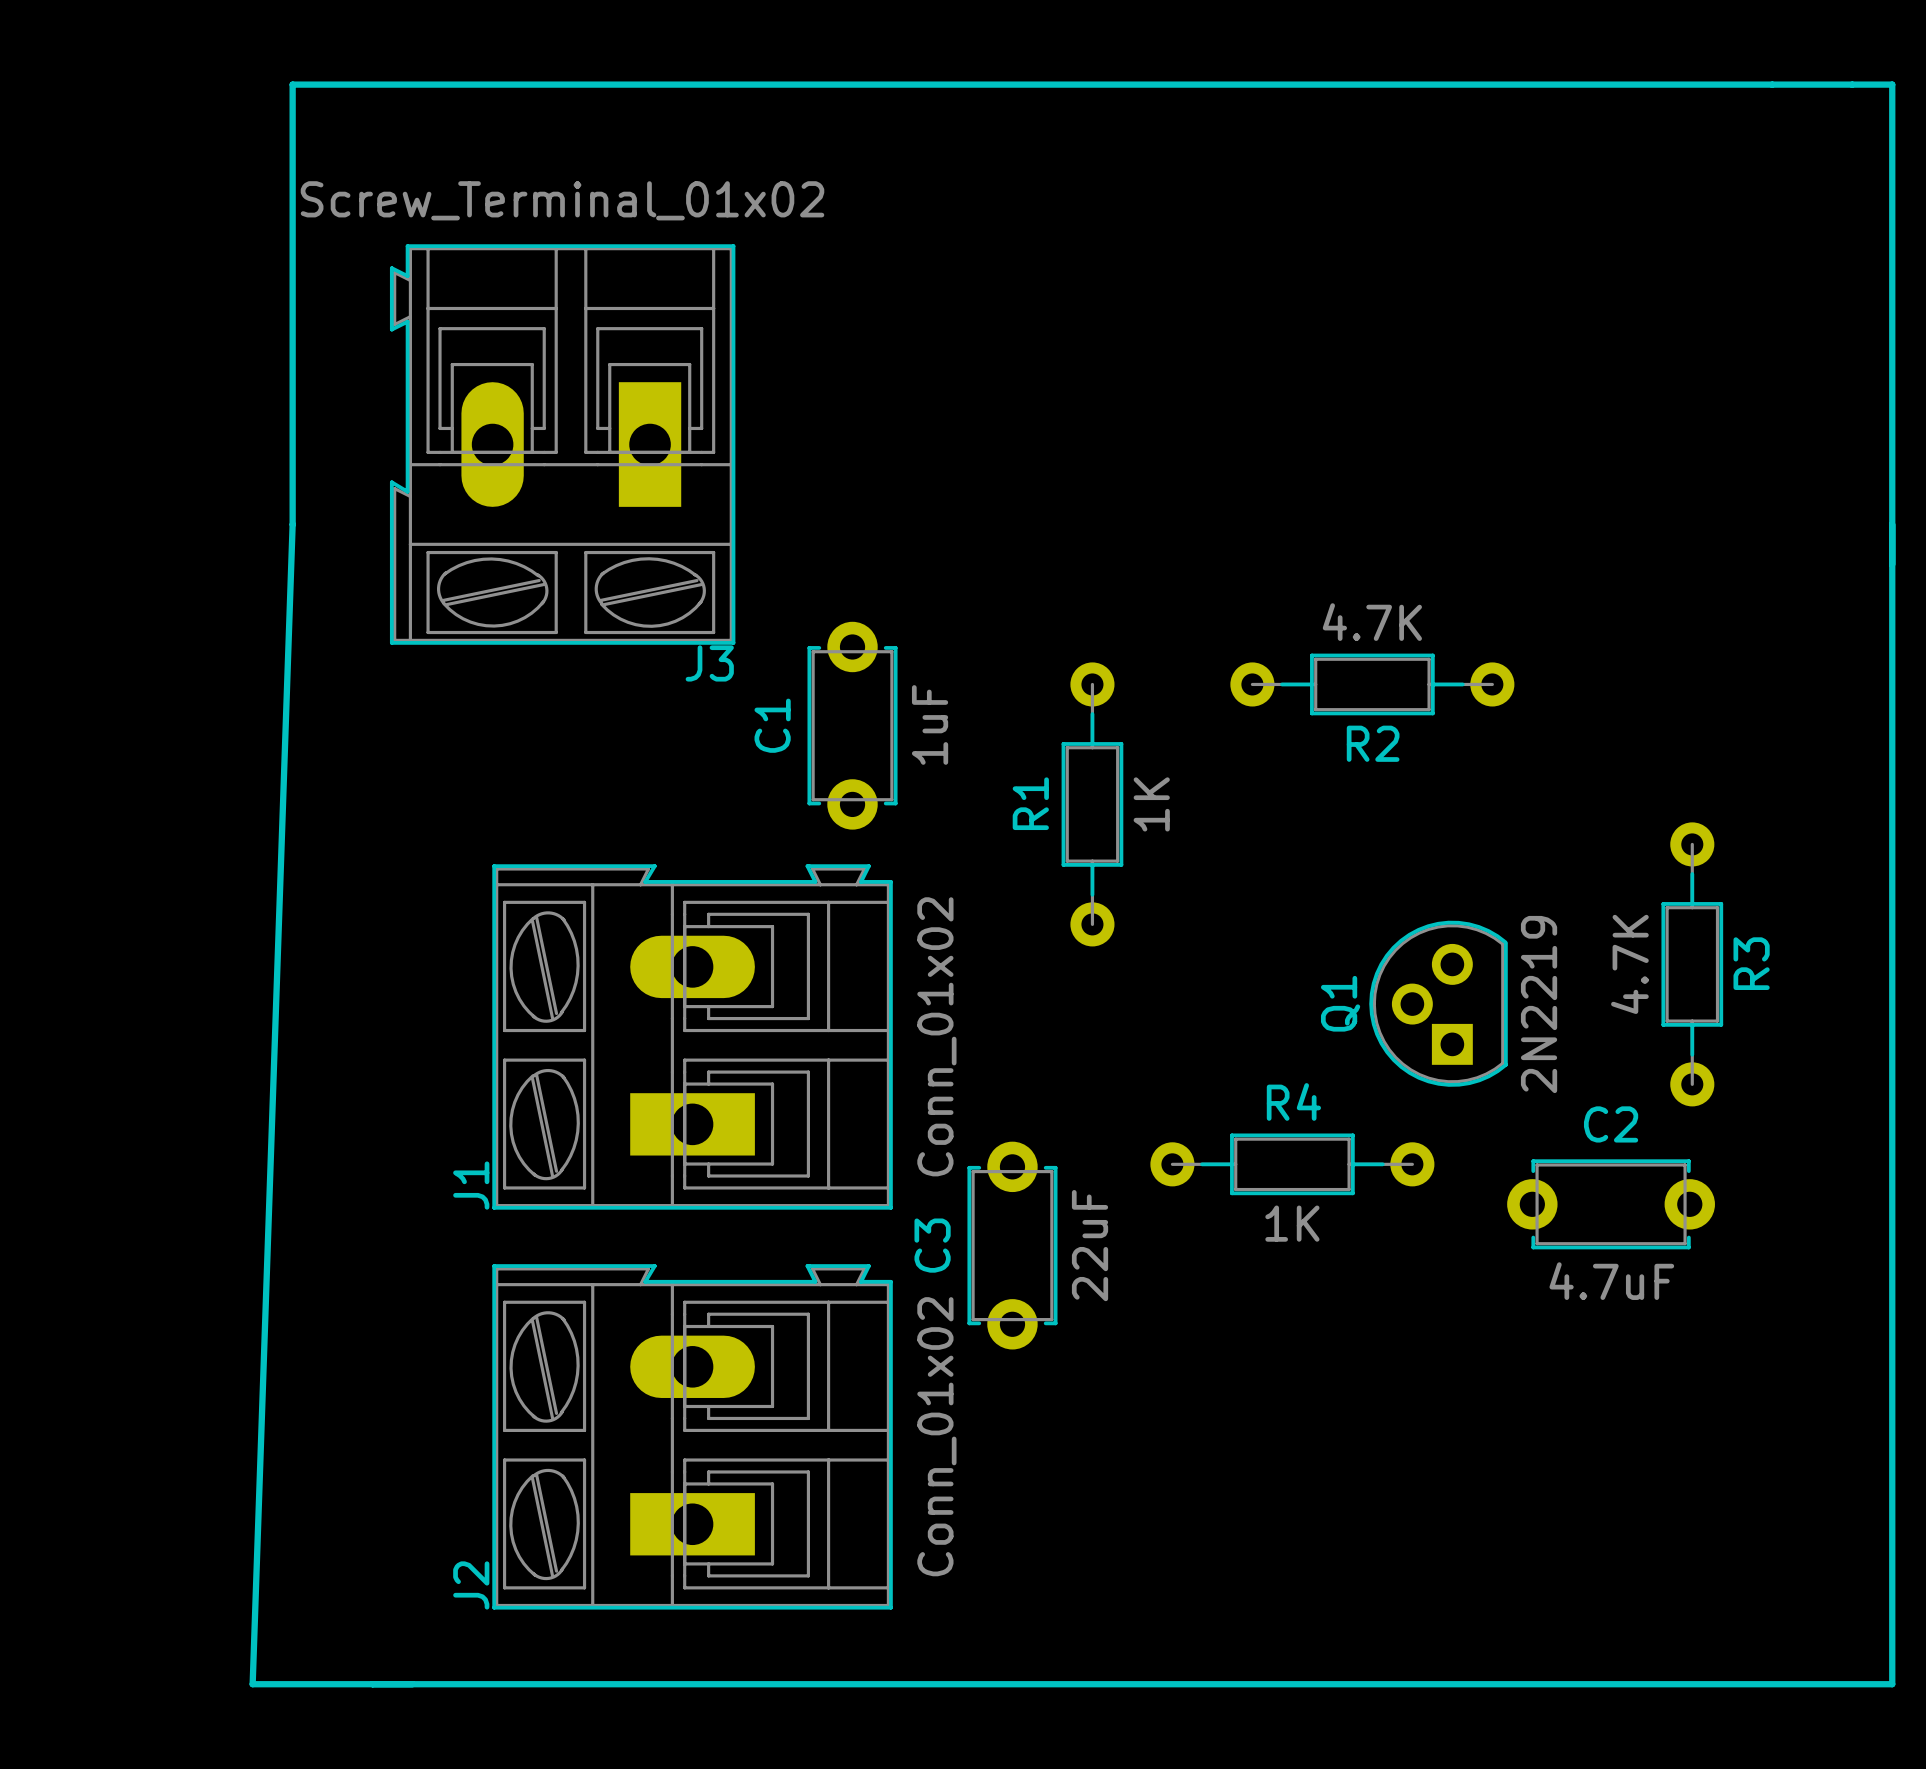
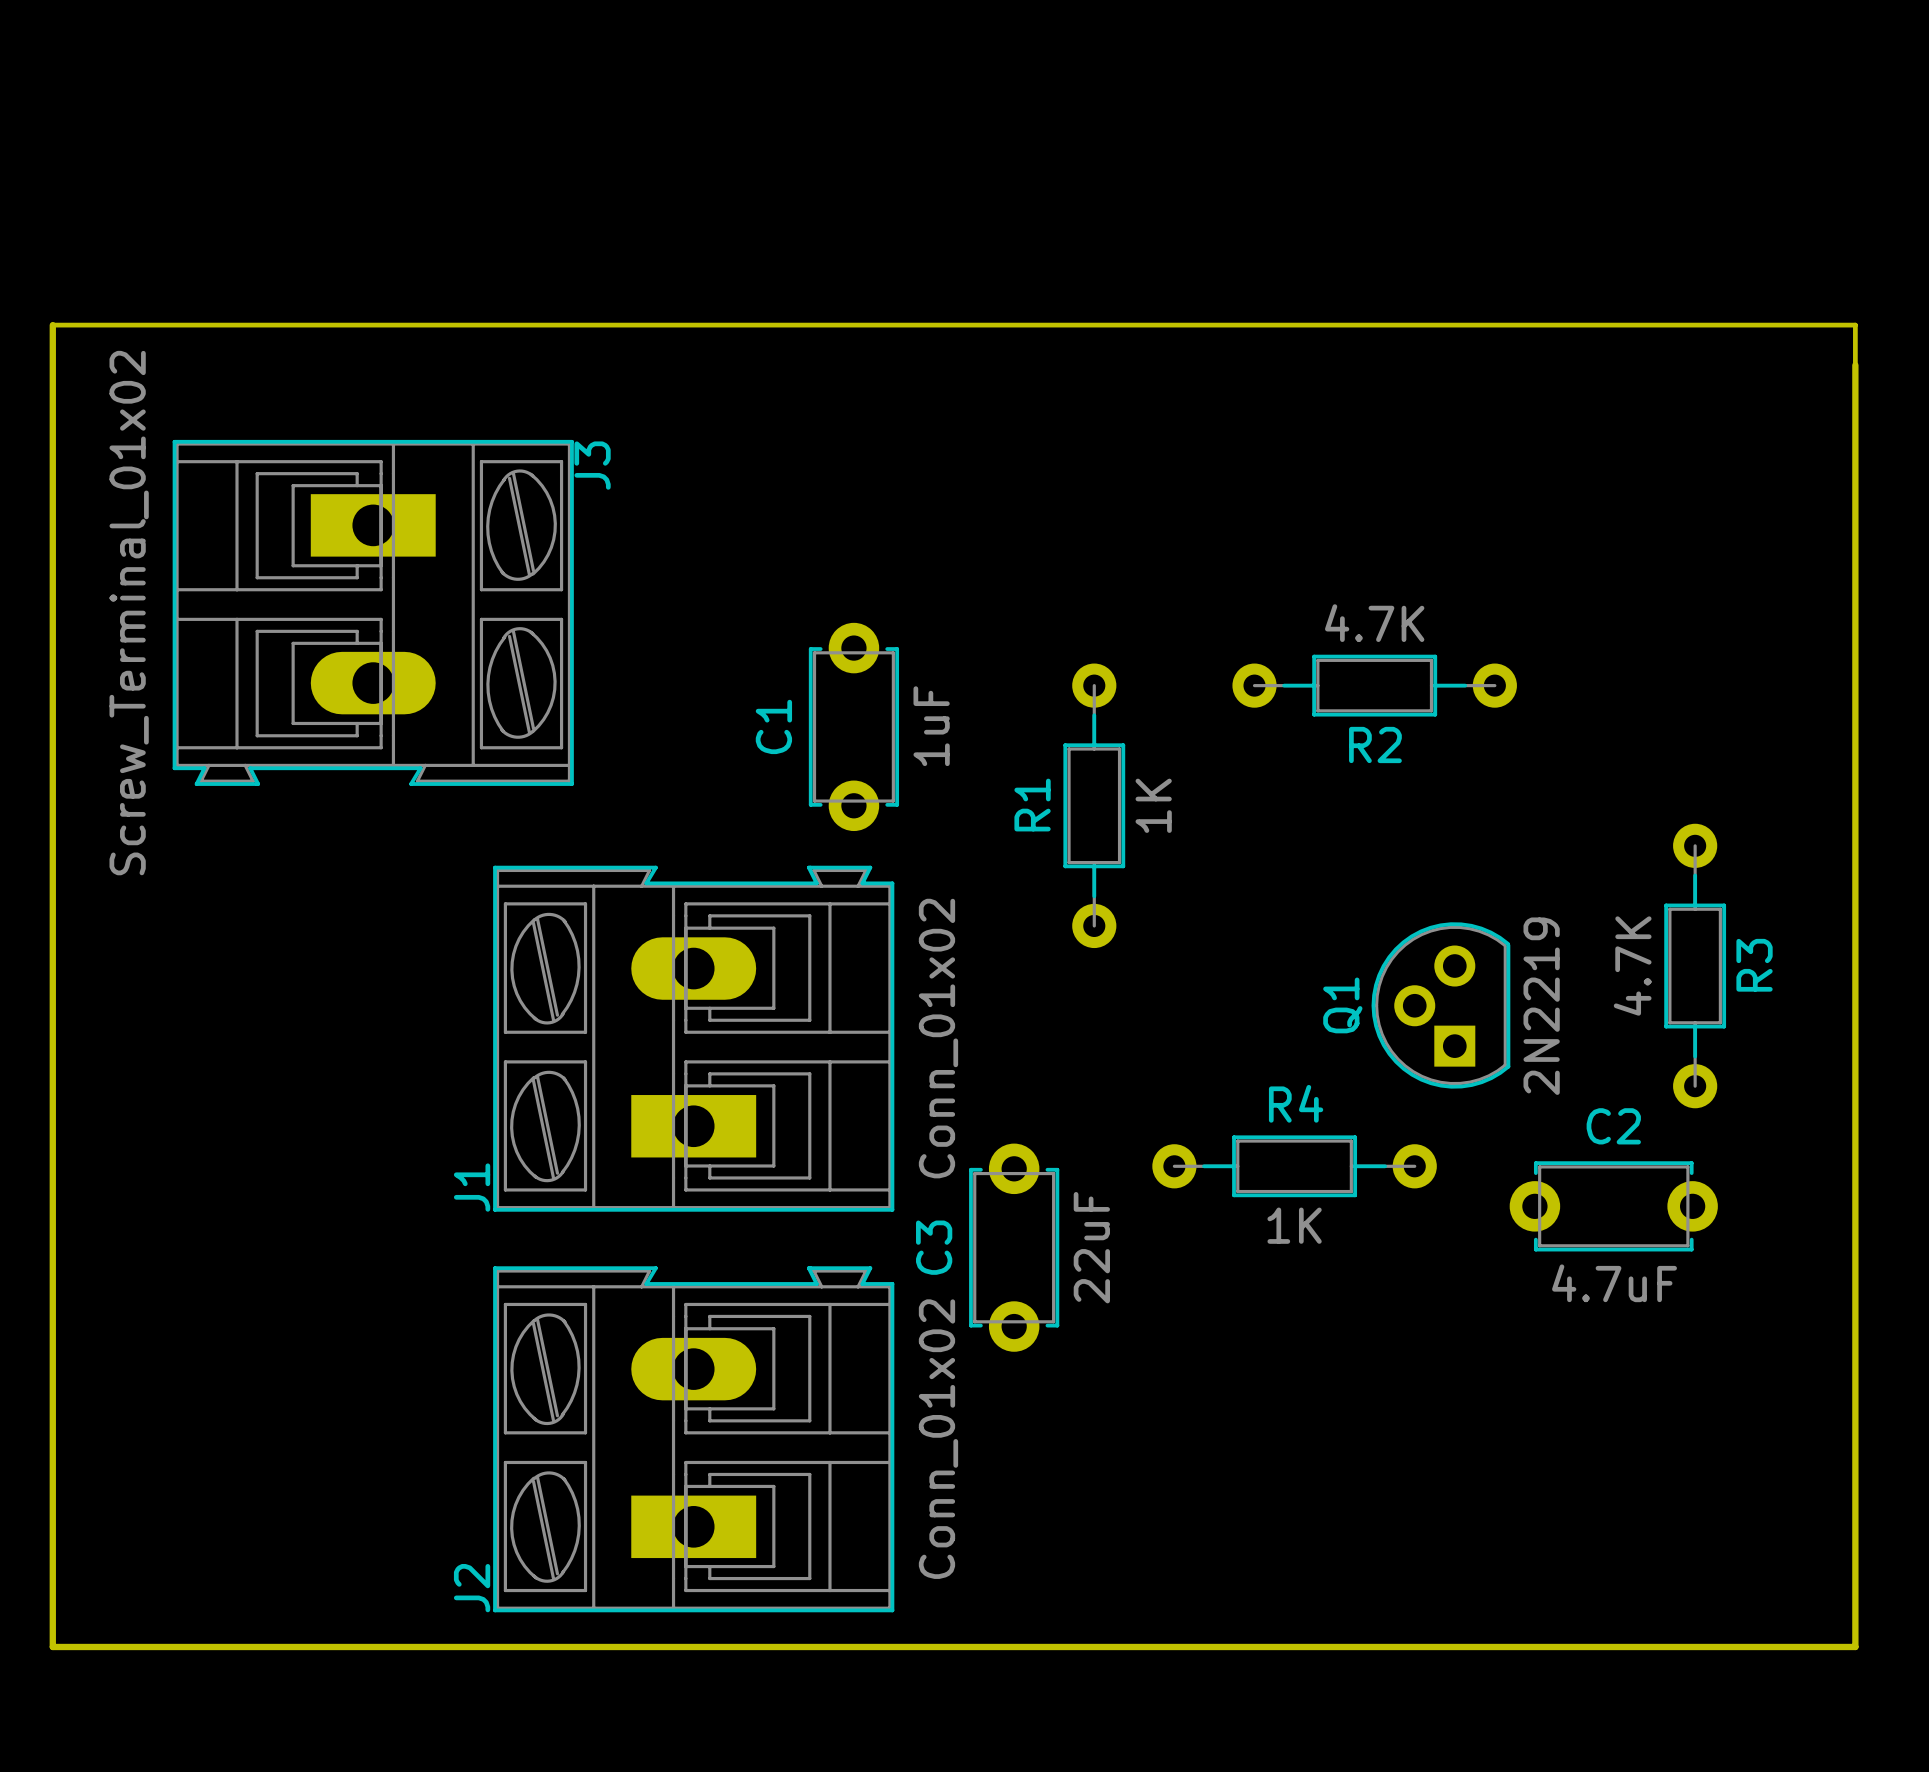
line: (292, 84) (1892, 84) (1892, 1684) (252, 1684) (292, 524) (292, 84) -> none
board edge: none -> (1855, 365) (1855, 1646) (52, 1646) (52, 325) (1855, 325) (1855, 405)
J3 rotation: 0° (562, 444) -> 90° counterclockwise (373, 612)
J3 position: (562, 444) -> (373, 612)

